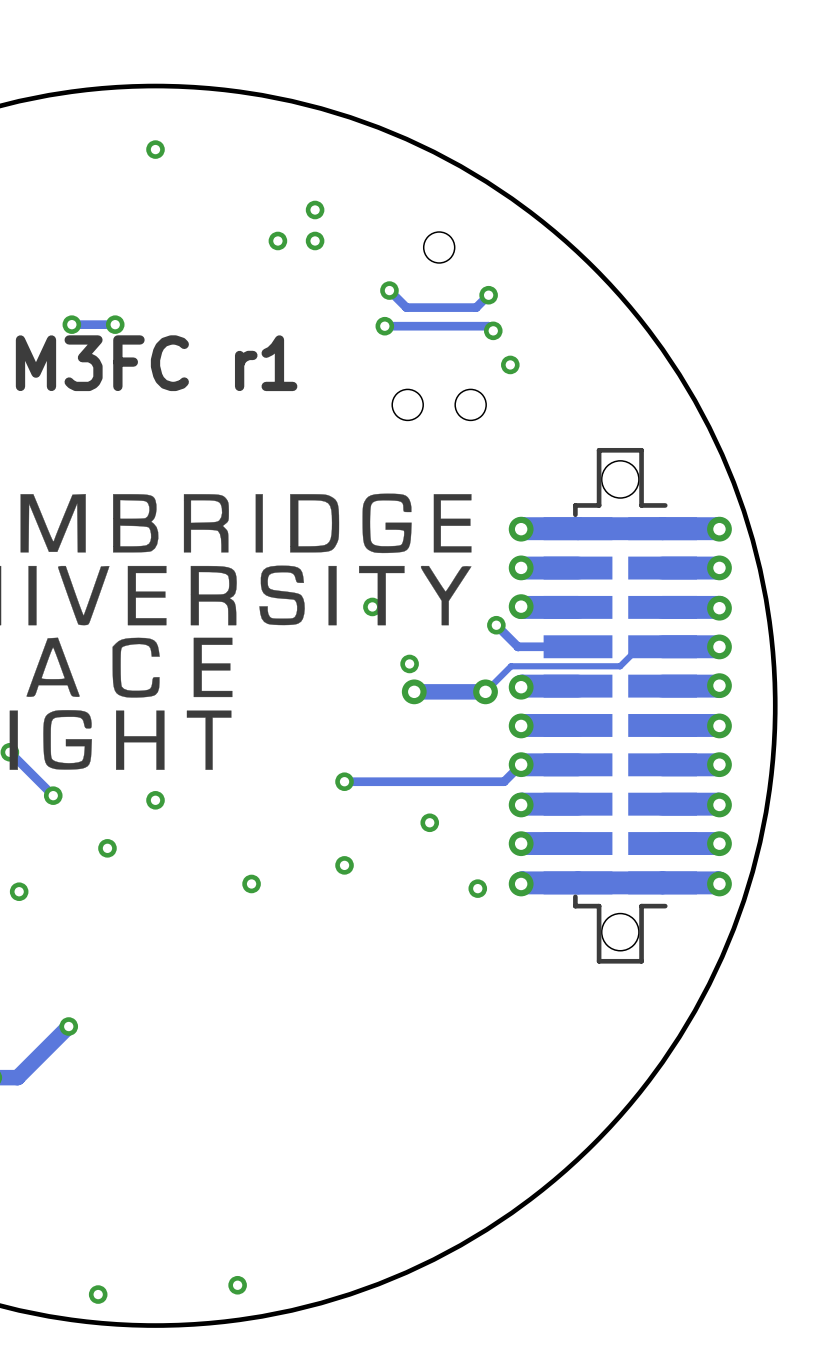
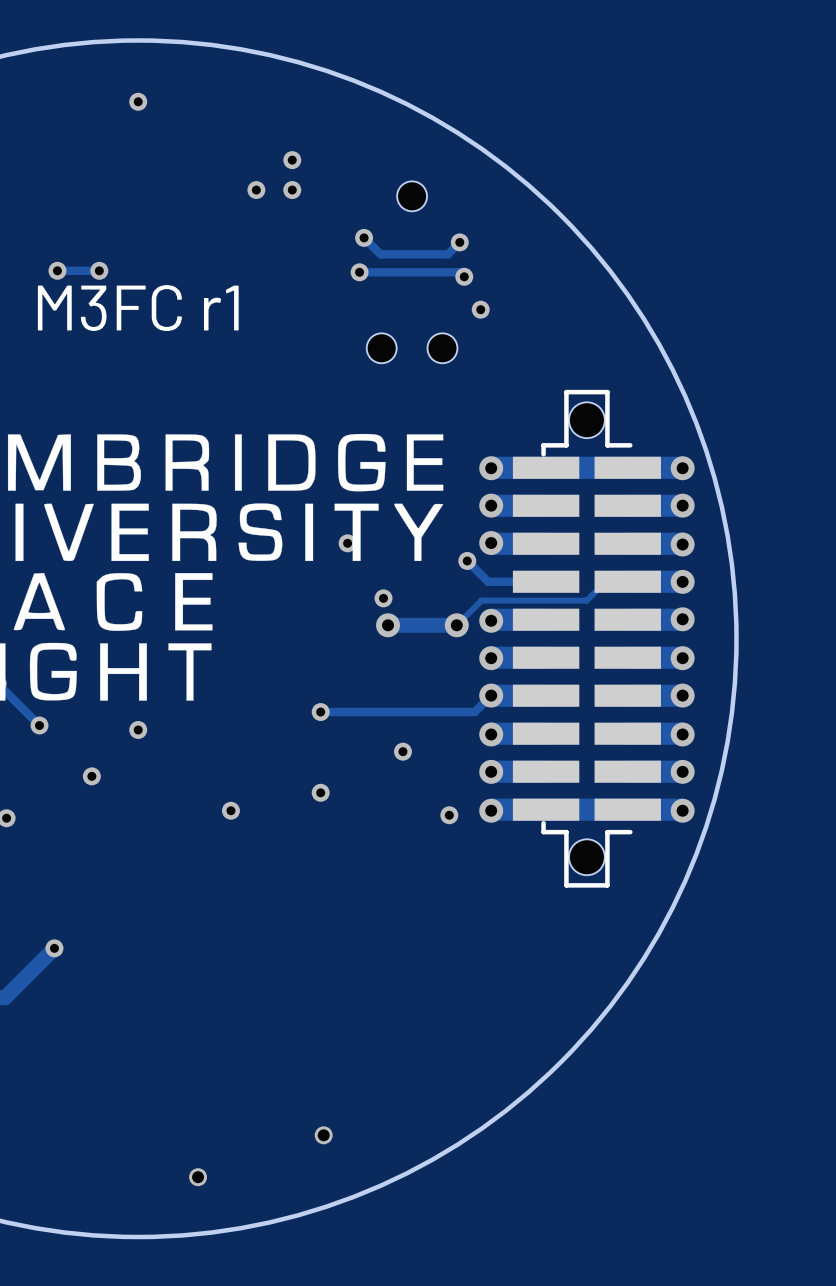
via: none -> (323, 1135)
via: none -> (198, 1177)
via: (237, 1285) -> none
via: (98, 1294) -> none

